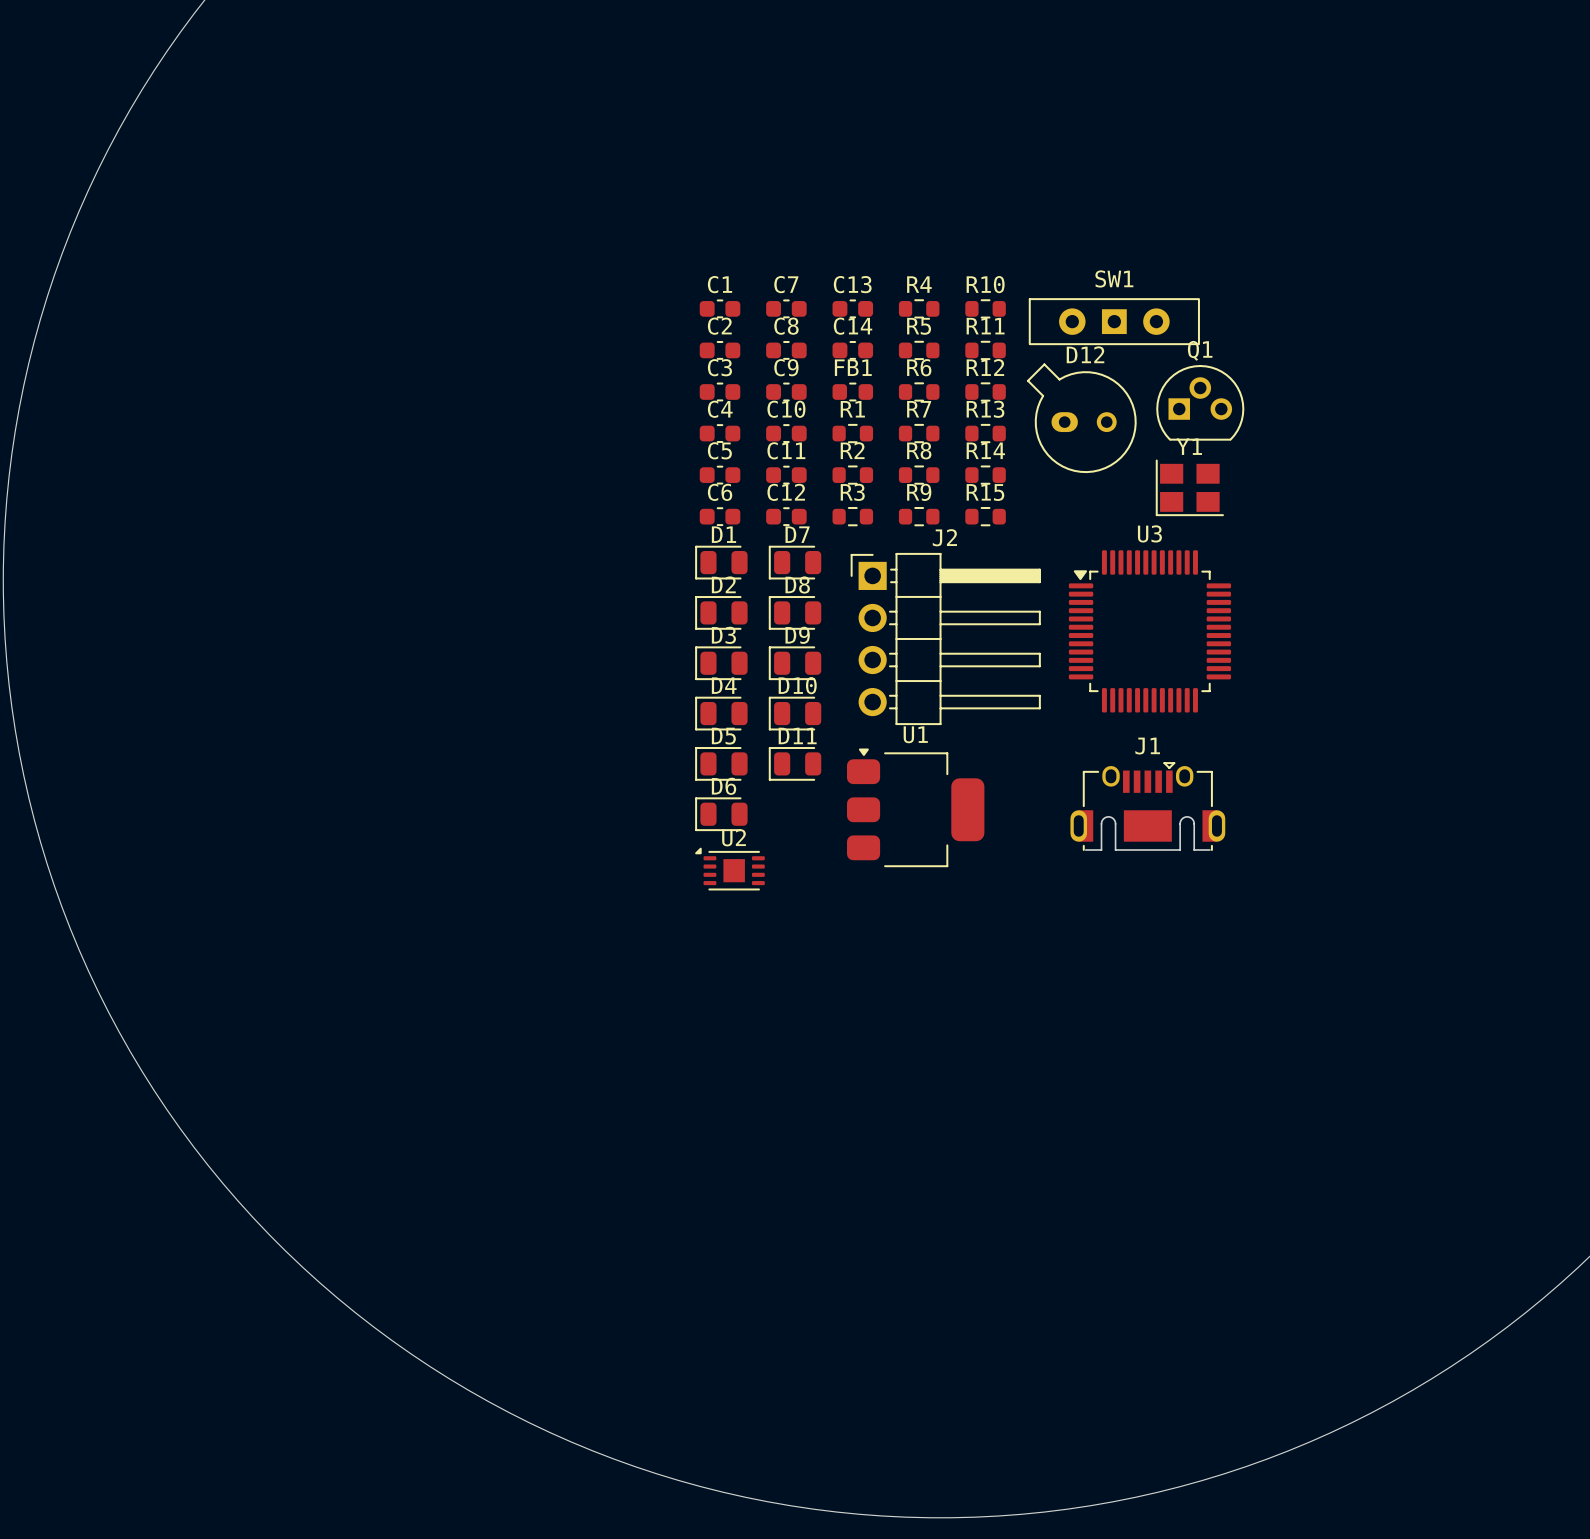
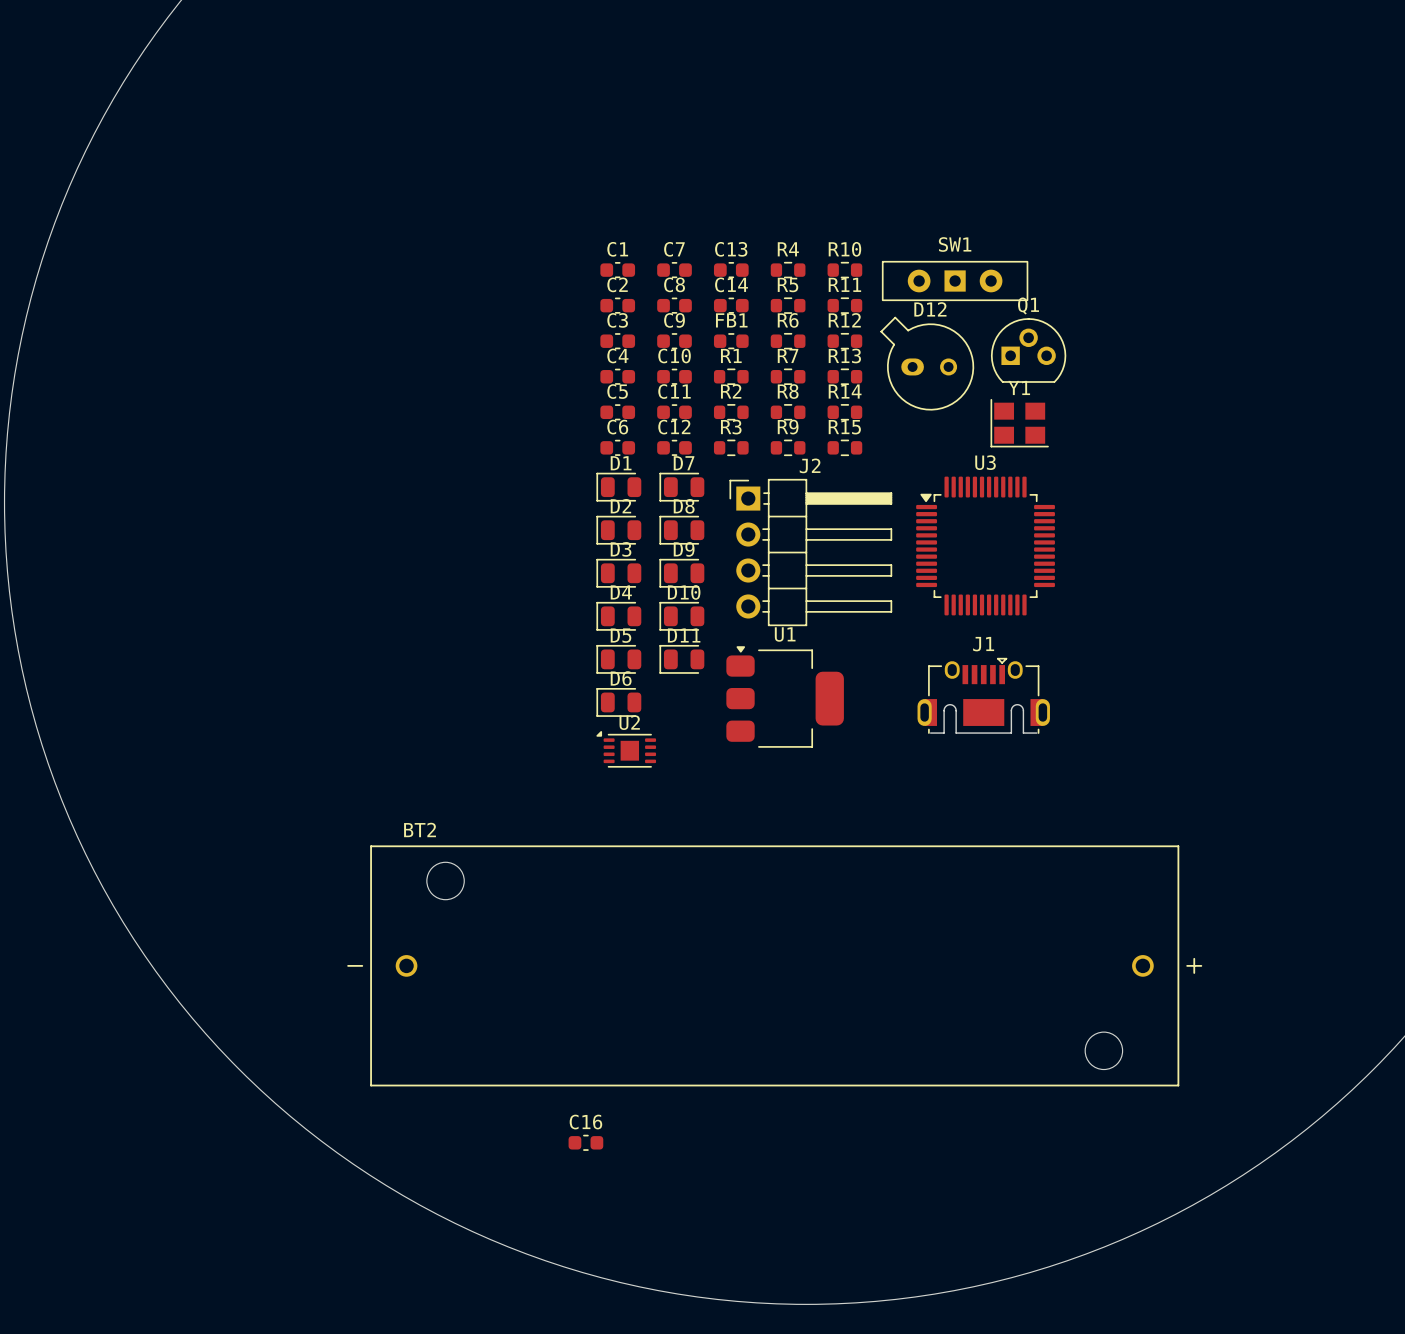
BT2: none -> (774, 965)
C16: none -> (585, 1142)

